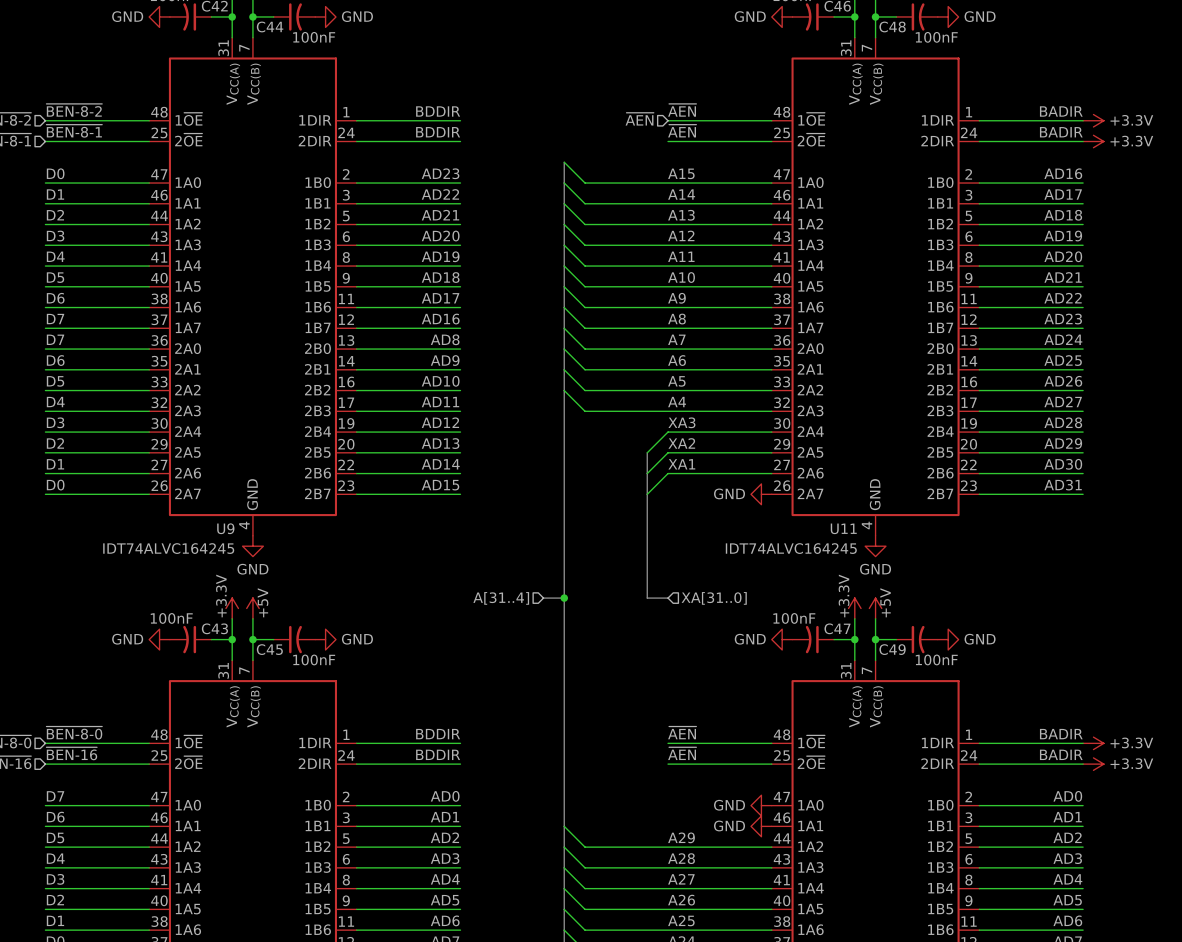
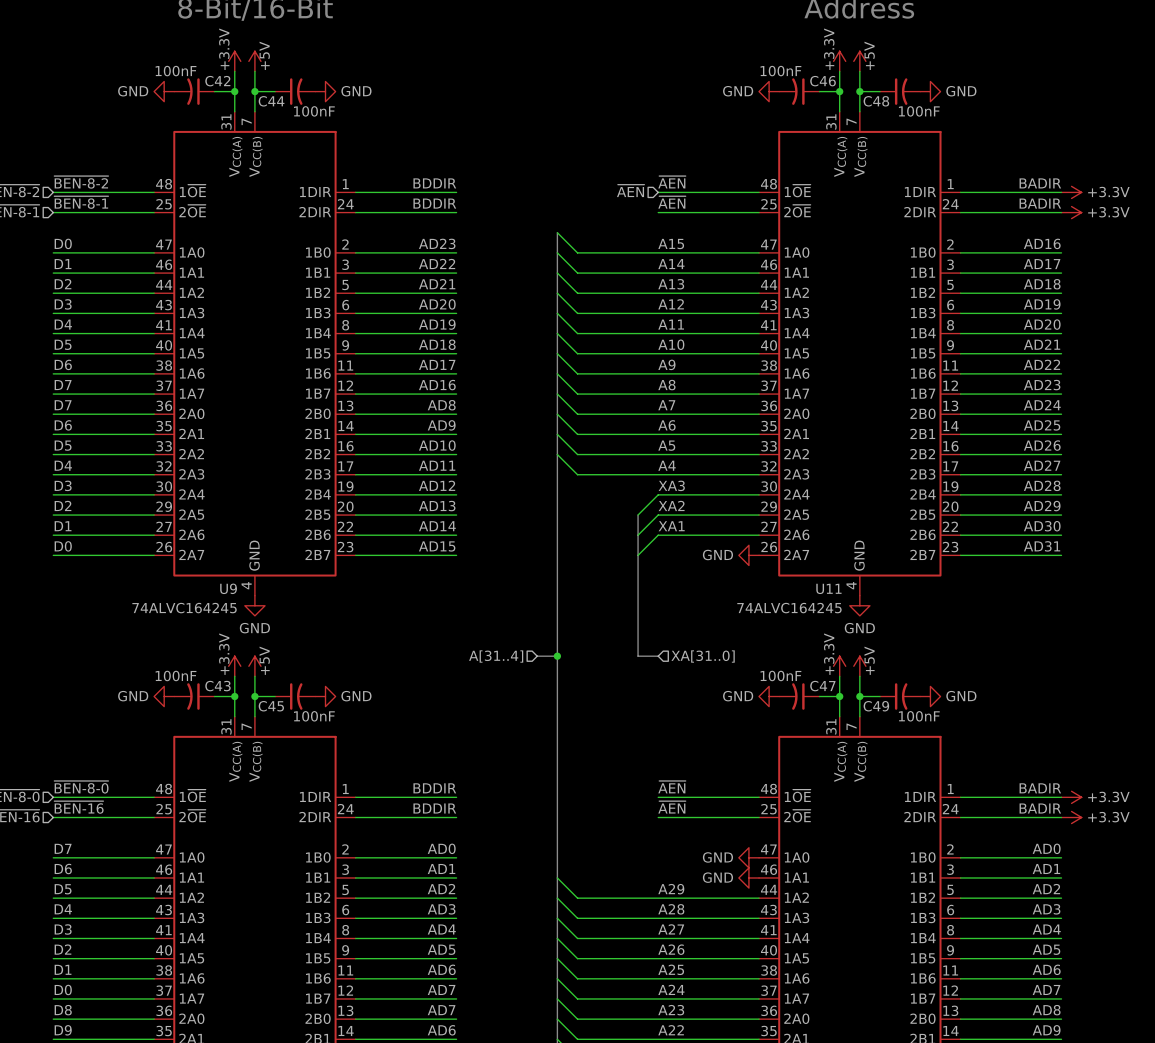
U9 value: IDT74ALVC164245 (168, 548) -> 74ALVC164245 (184, 608)
U11 value: IDT74ALVC164245 (791, 548) -> 74ALVC164245 (789, 608)

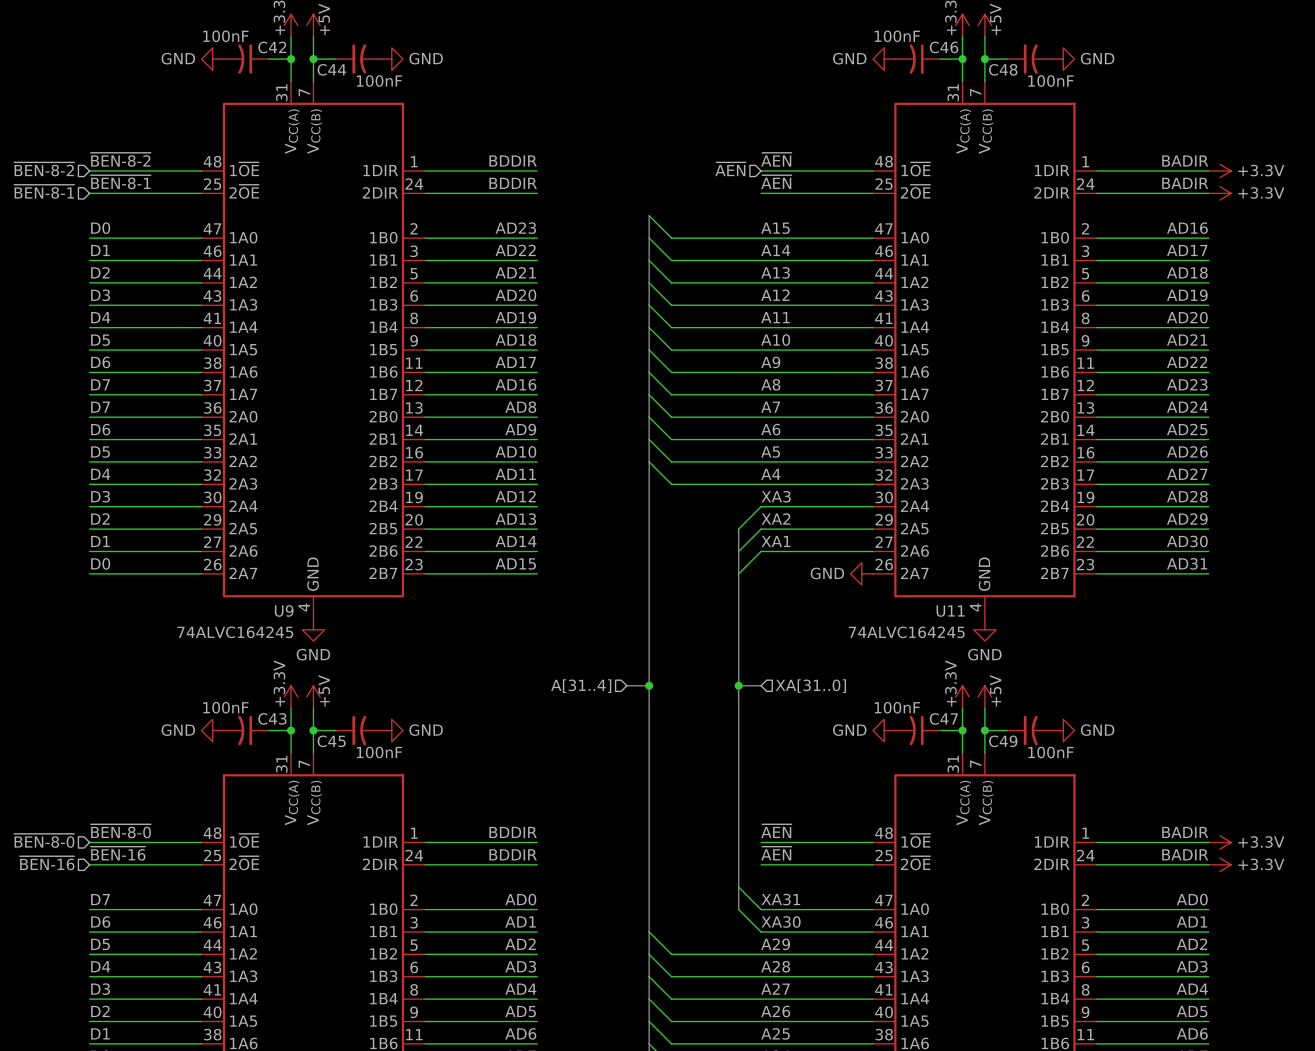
bus: none -> (738, 685) (738, 909)
junction: none -> (738, 685)
wire: none -> (738, 887) (761, 909) (872, 909)
label: none -> XA31 (780, 899)
wire: none -> (738, 909) (761, 931) (872, 931)
power symbol: GND (748, 857) -> none
label: none -> XA30 (781, 921)
power symbol: GND (748, 877) -> none

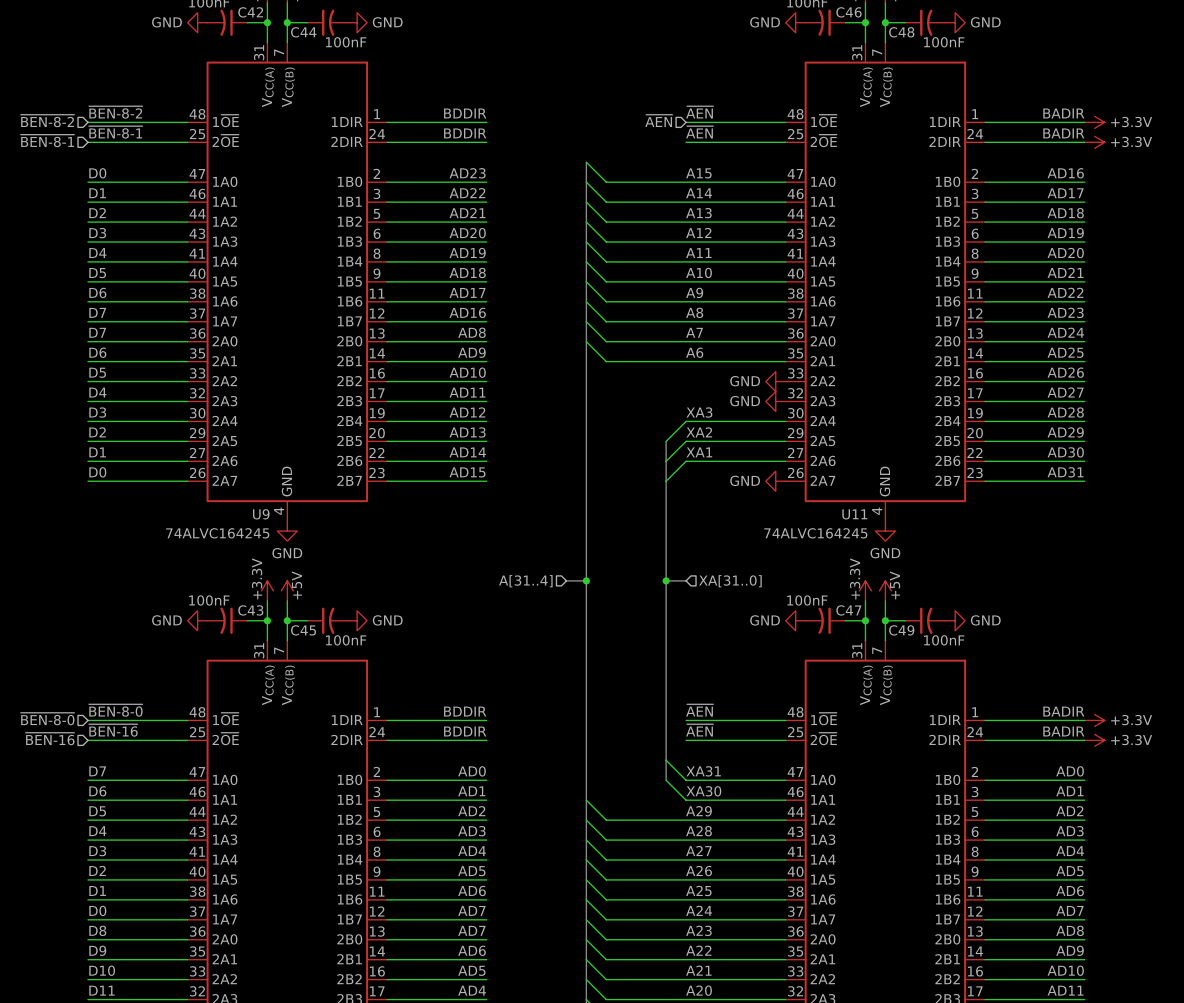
wire: (649, 439) (671, 461) (872, 461) -> none
label: A5 (770, 452) -> none
wire: (649, 461) (671, 484) (872, 484) -> none
power symbol: none -> GND (775, 381)
label: A4 (770, 474) -> none
power symbol: none -> GND (775, 401)

